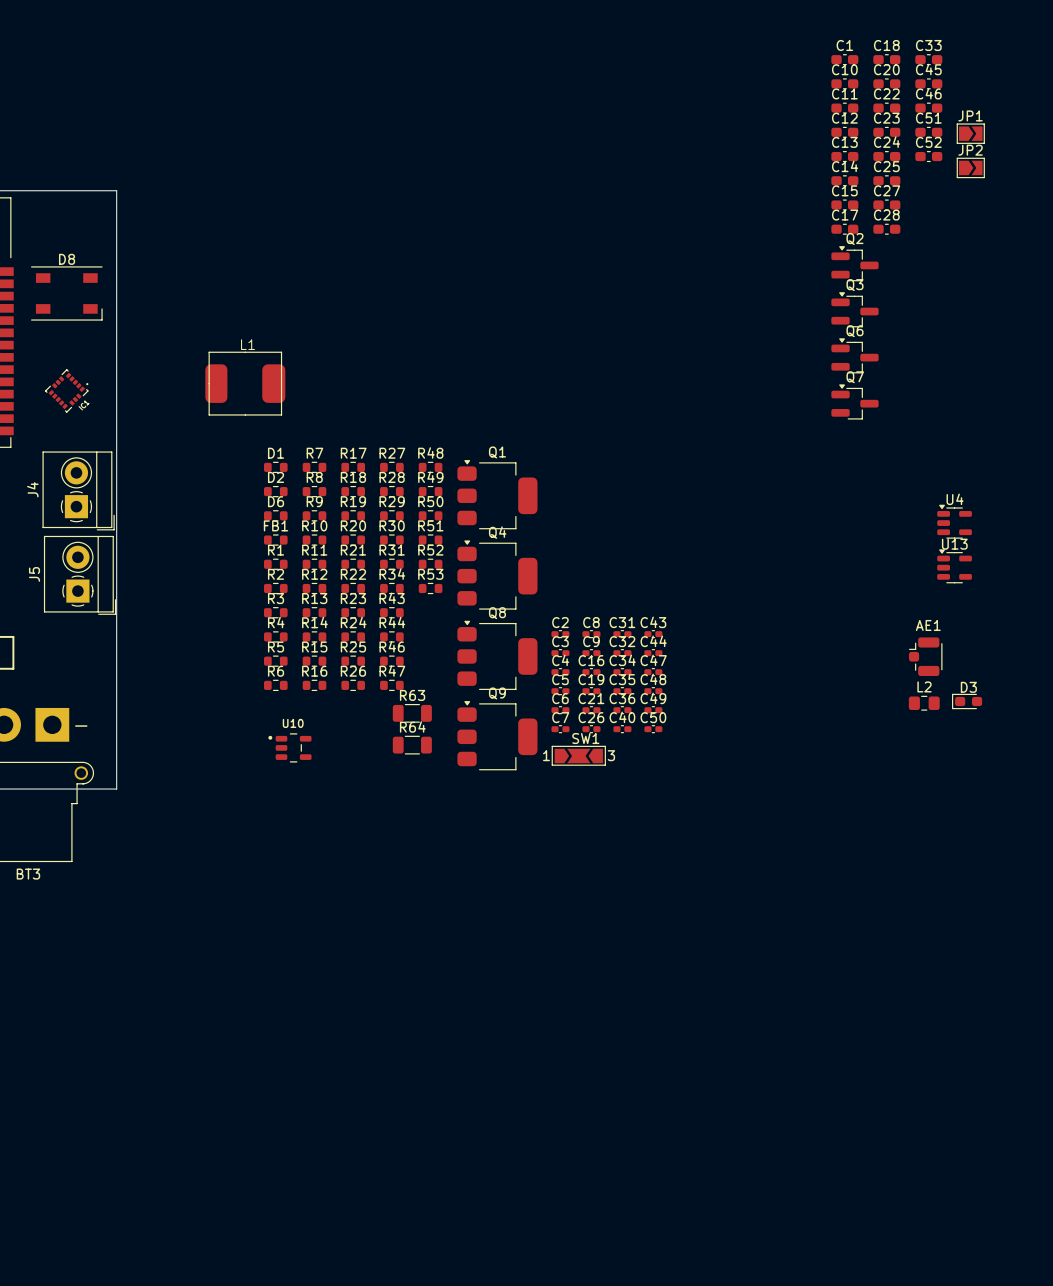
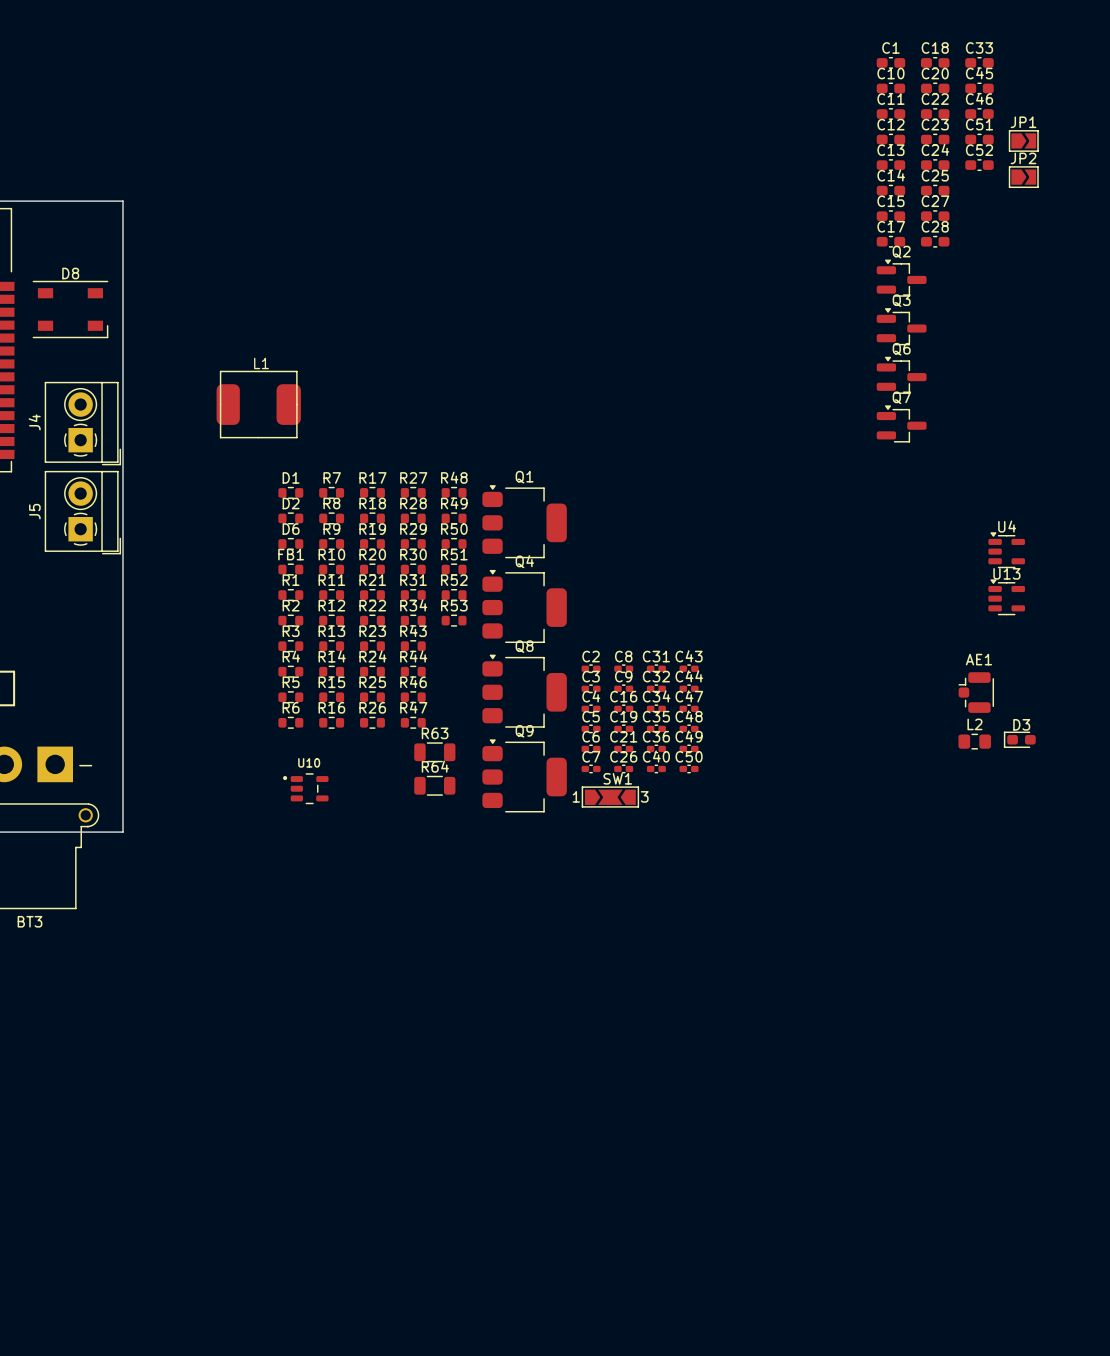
part: (66, 390) -> none
J4 position: (78, 490) -> (82, 423)
J5 position: (80, 575) -> (82, 512)

